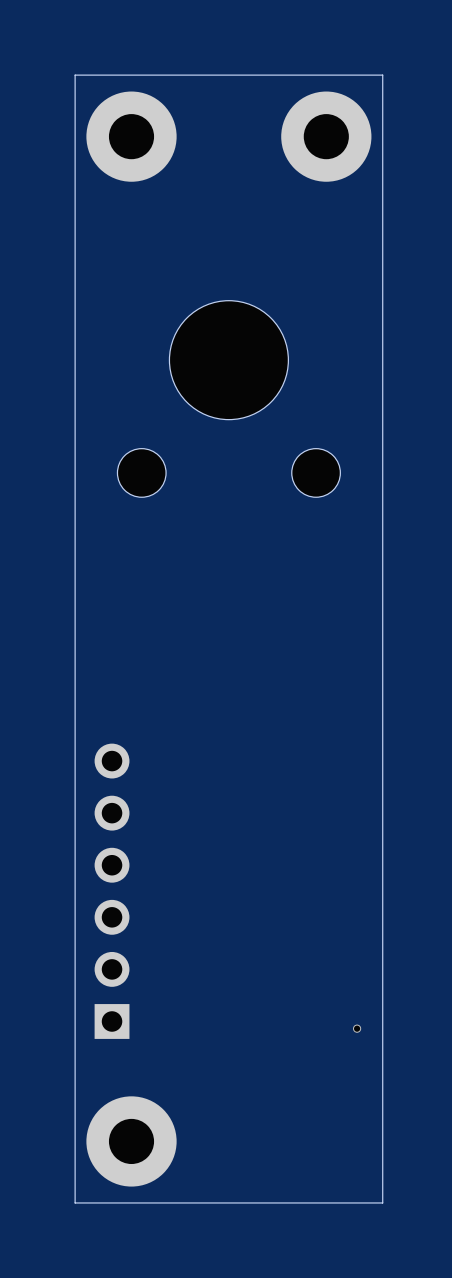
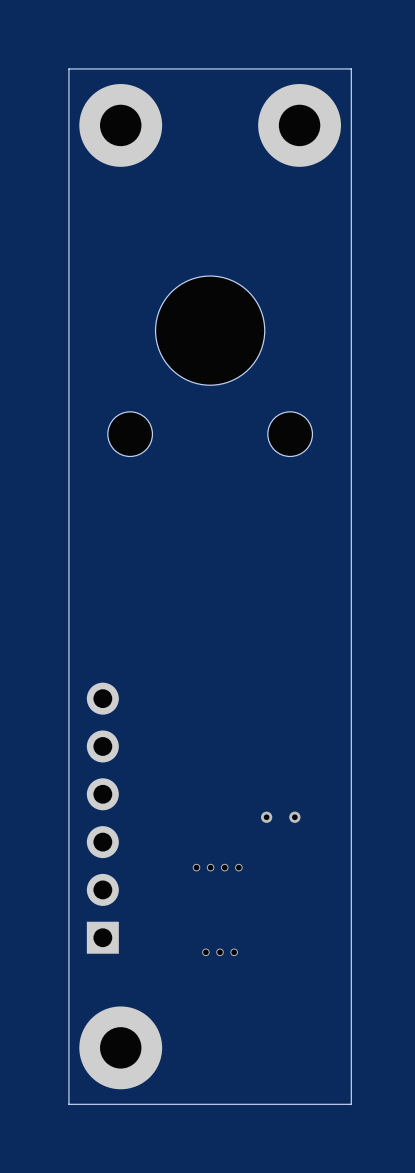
via: none -> (266, 817)
via: none -> (294, 817)
via: none -> (196, 867)
via: none -> (210, 867)
via: none -> (224, 867)
via: none -> (238, 867)
via: (357, 1028) -> none
via: none -> (205, 952)
via: none -> (220, 952)
via: none -> (234, 952)

